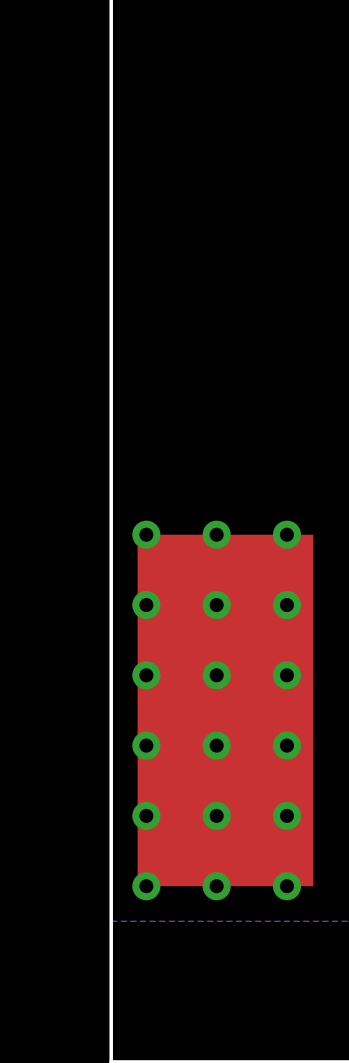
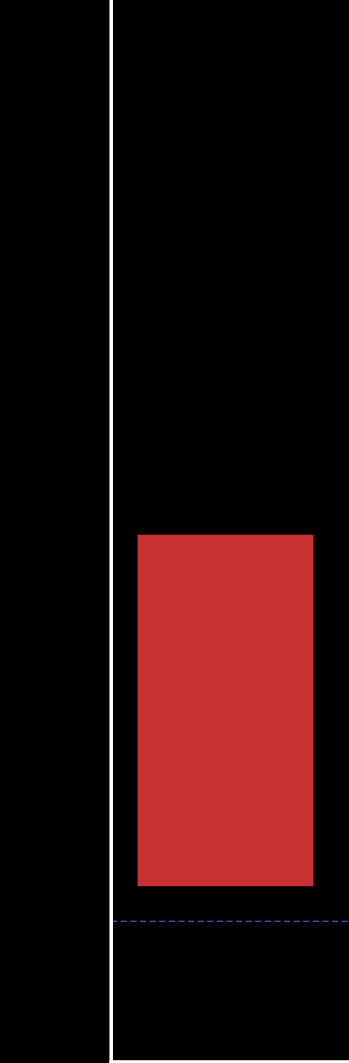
via: (146, 534) -> none
via: (216, 534) -> none
via: (286, 534) -> none
via: (146, 605) -> none
via: (216, 605) -> none
via: (286, 605) -> none
via: (146, 675) -> none
via: (216, 675) -> none
via: (286, 675) -> none
via: (146, 745) -> none
via: (216, 745) -> none
via: (286, 745) -> none
via: (146, 815) -> none
via: (216, 815) -> none
via: (286, 815) -> none
via: (146, 886) -> none
via: (216, 886) -> none
via: (286, 886) -> none

